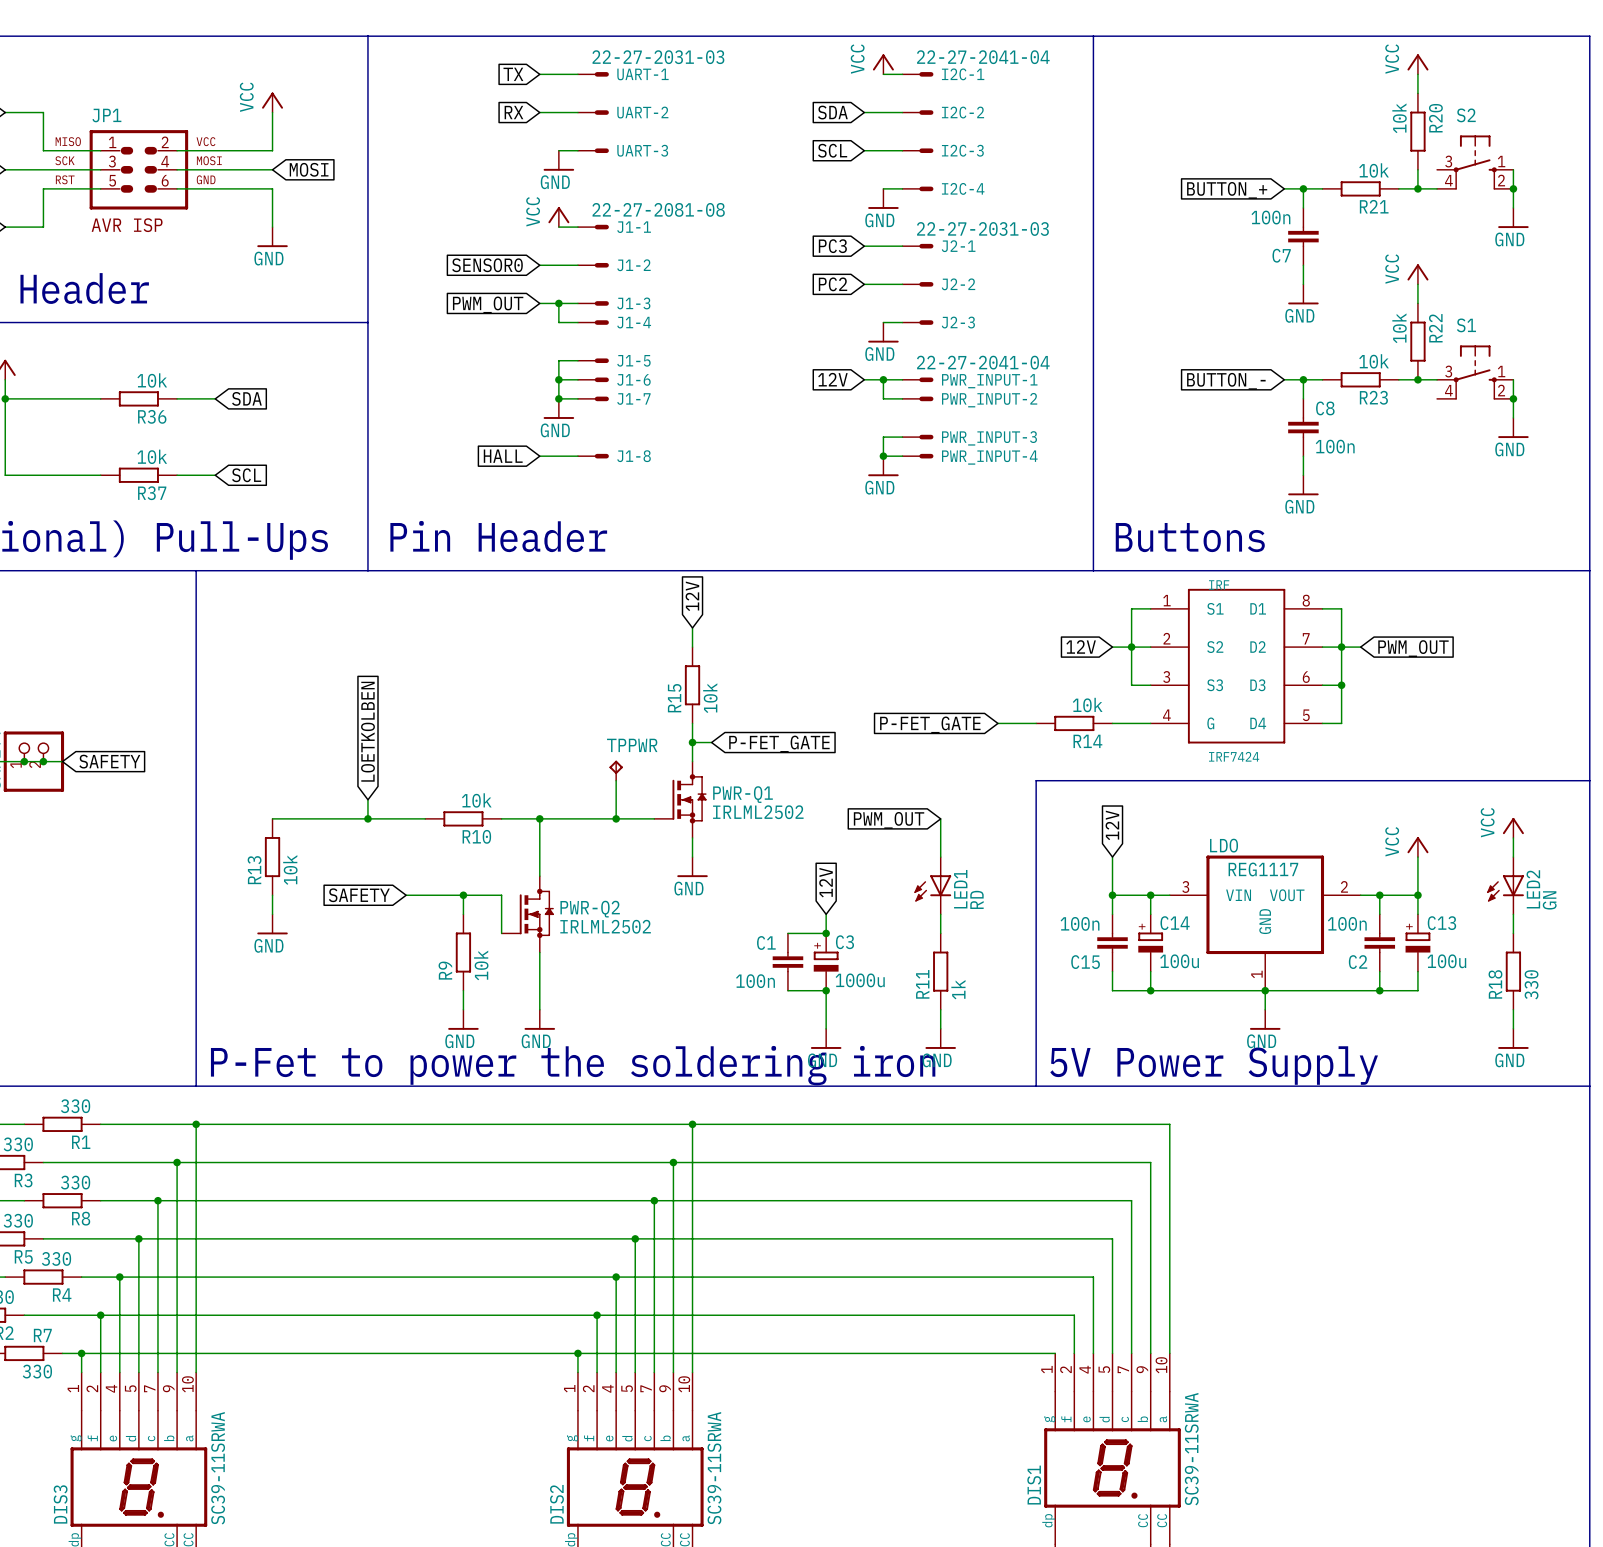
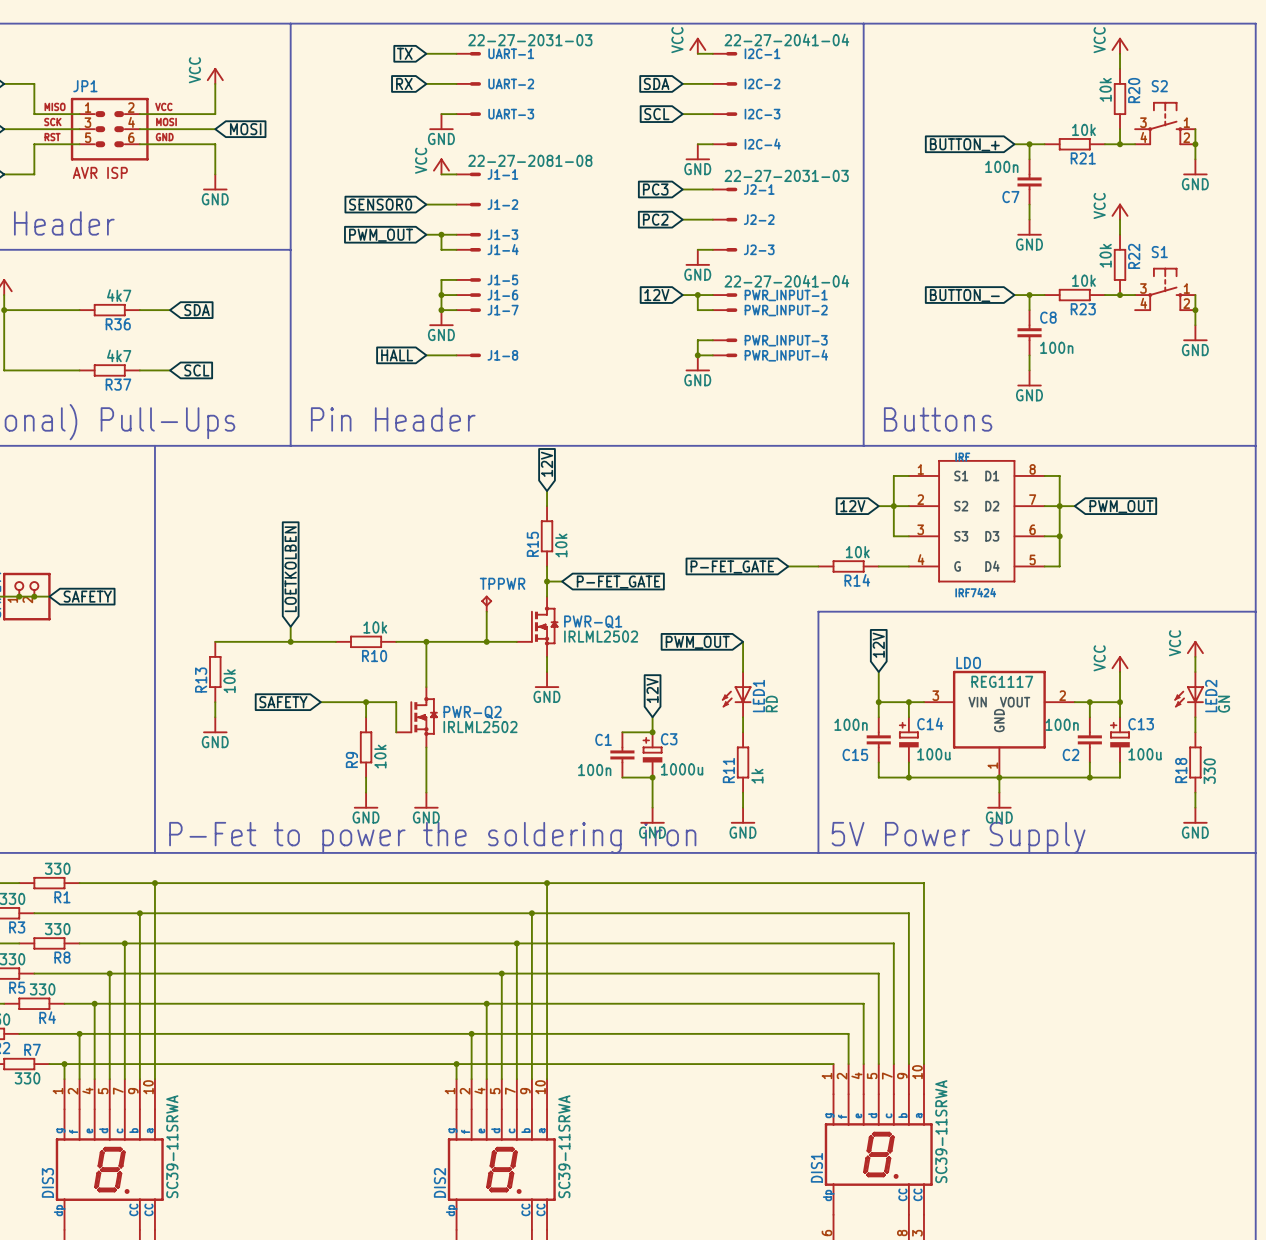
R36 value: 10k (152, 380) -> 4k7 (119, 295)
R37 value: 10k (152, 456) -> 4k7 (119, 355)

